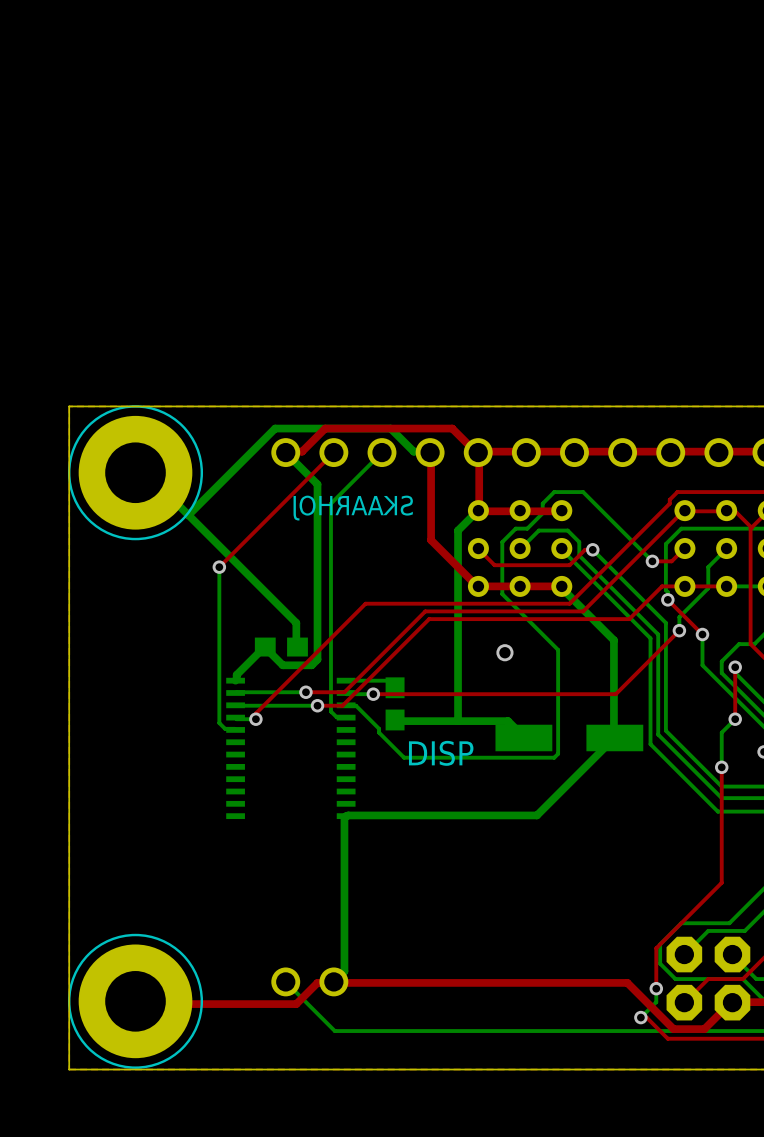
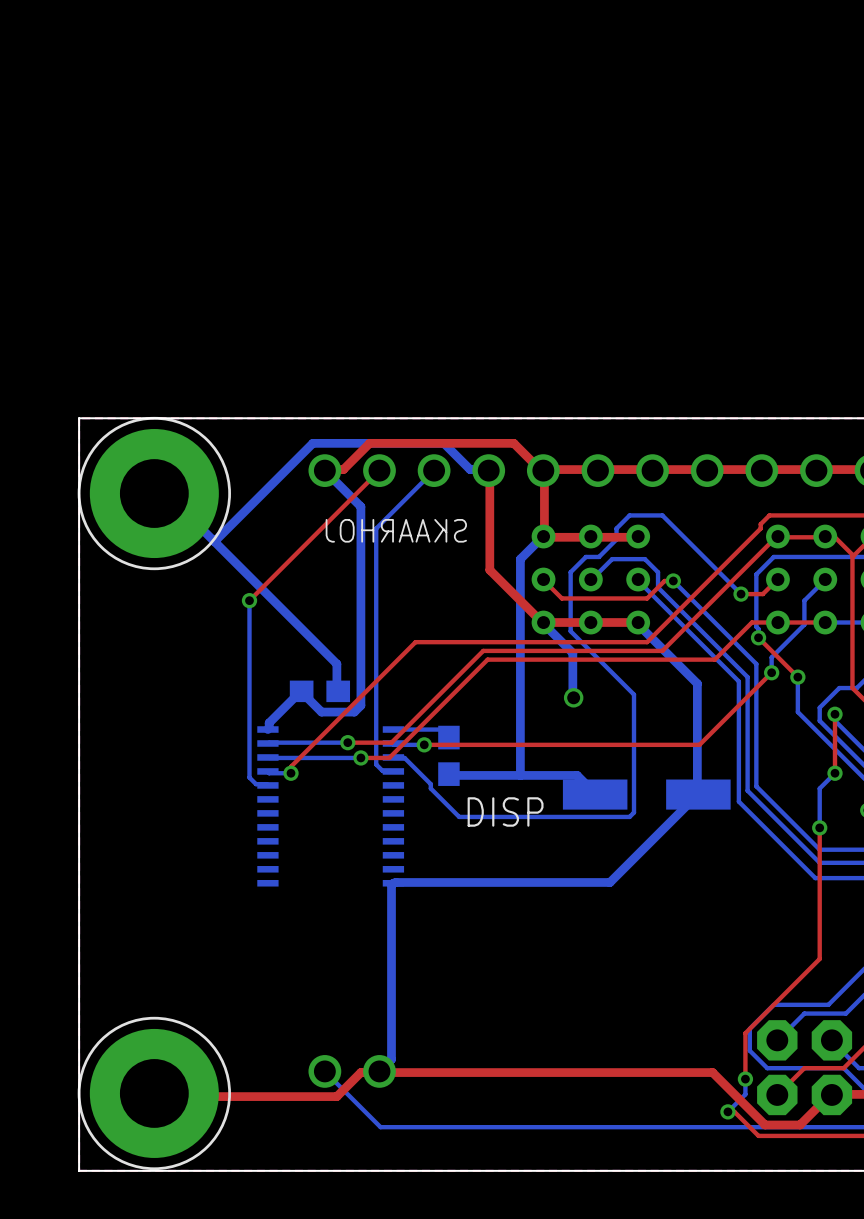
bottom track: none -> (543, 622) (572, 653) (573, 697)

